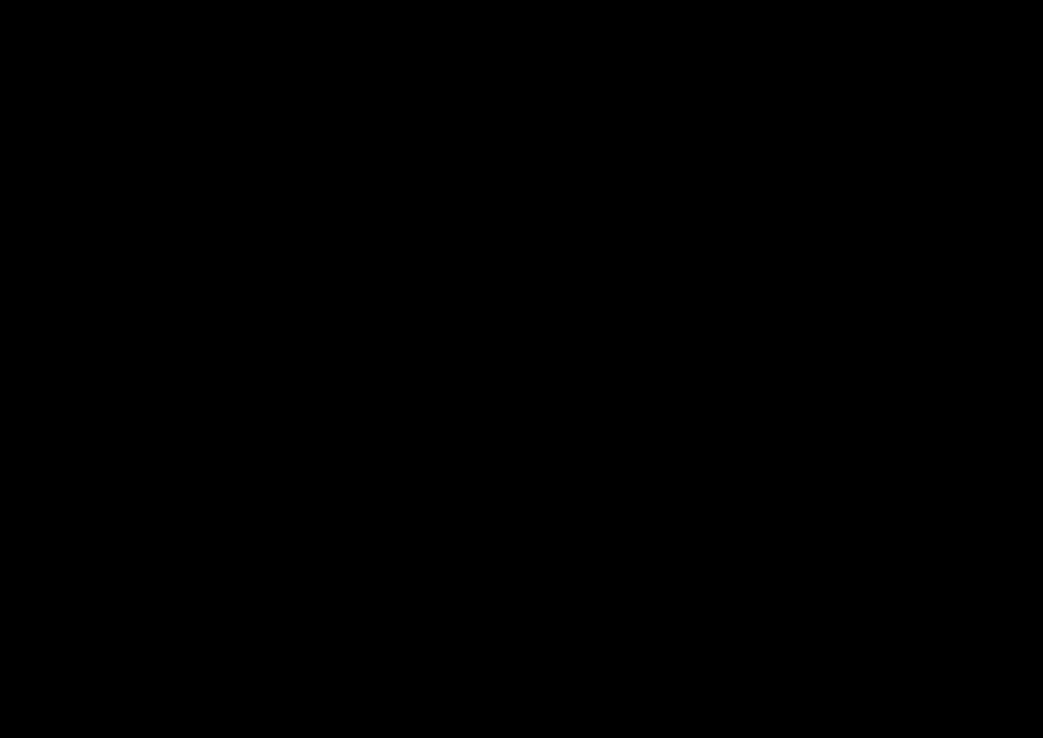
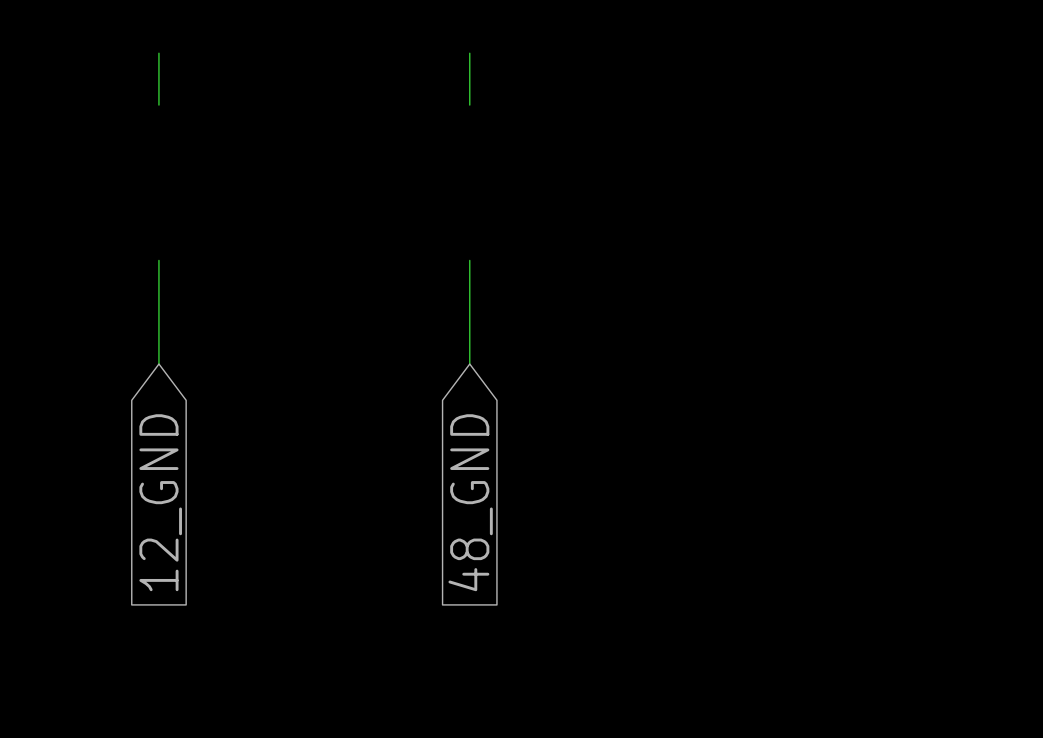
wire: none -> (158, 53) (158, 105)
wire: none -> (469, 53) (469, 105)
wire: none -> (158, 260) (158, 364)
wire: none -> (469, 260) (469, 364)
global label: none -> 12_GND (160, 502)
global label: none -> 48_GND (470, 502)

